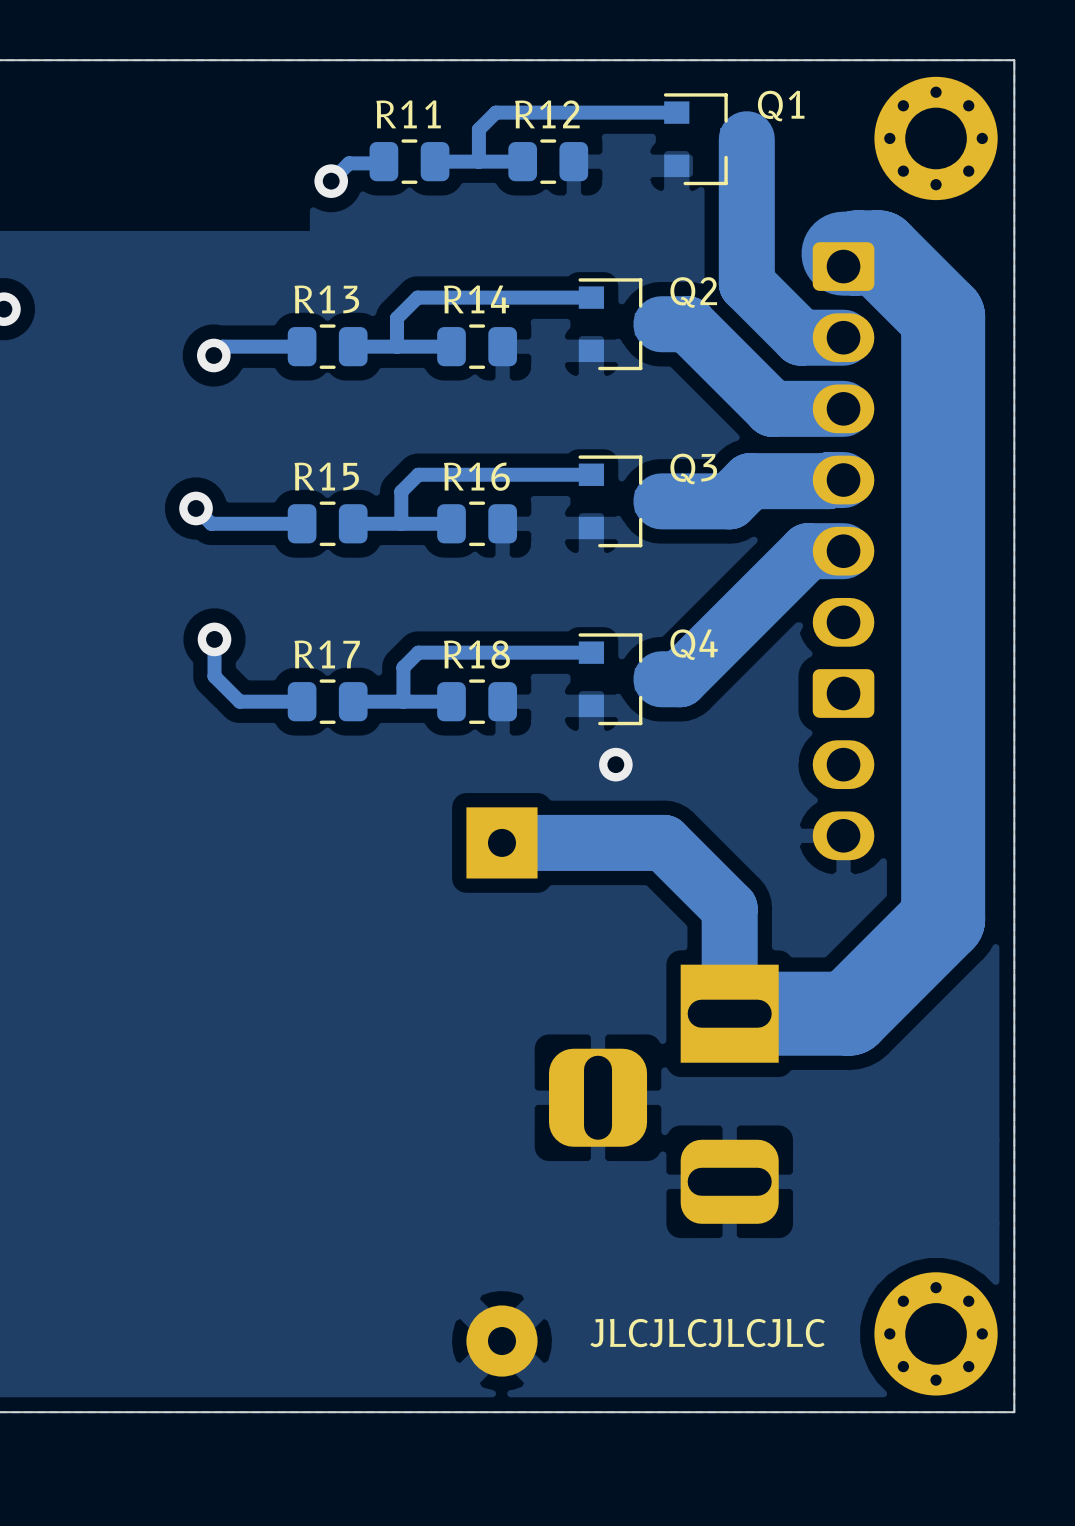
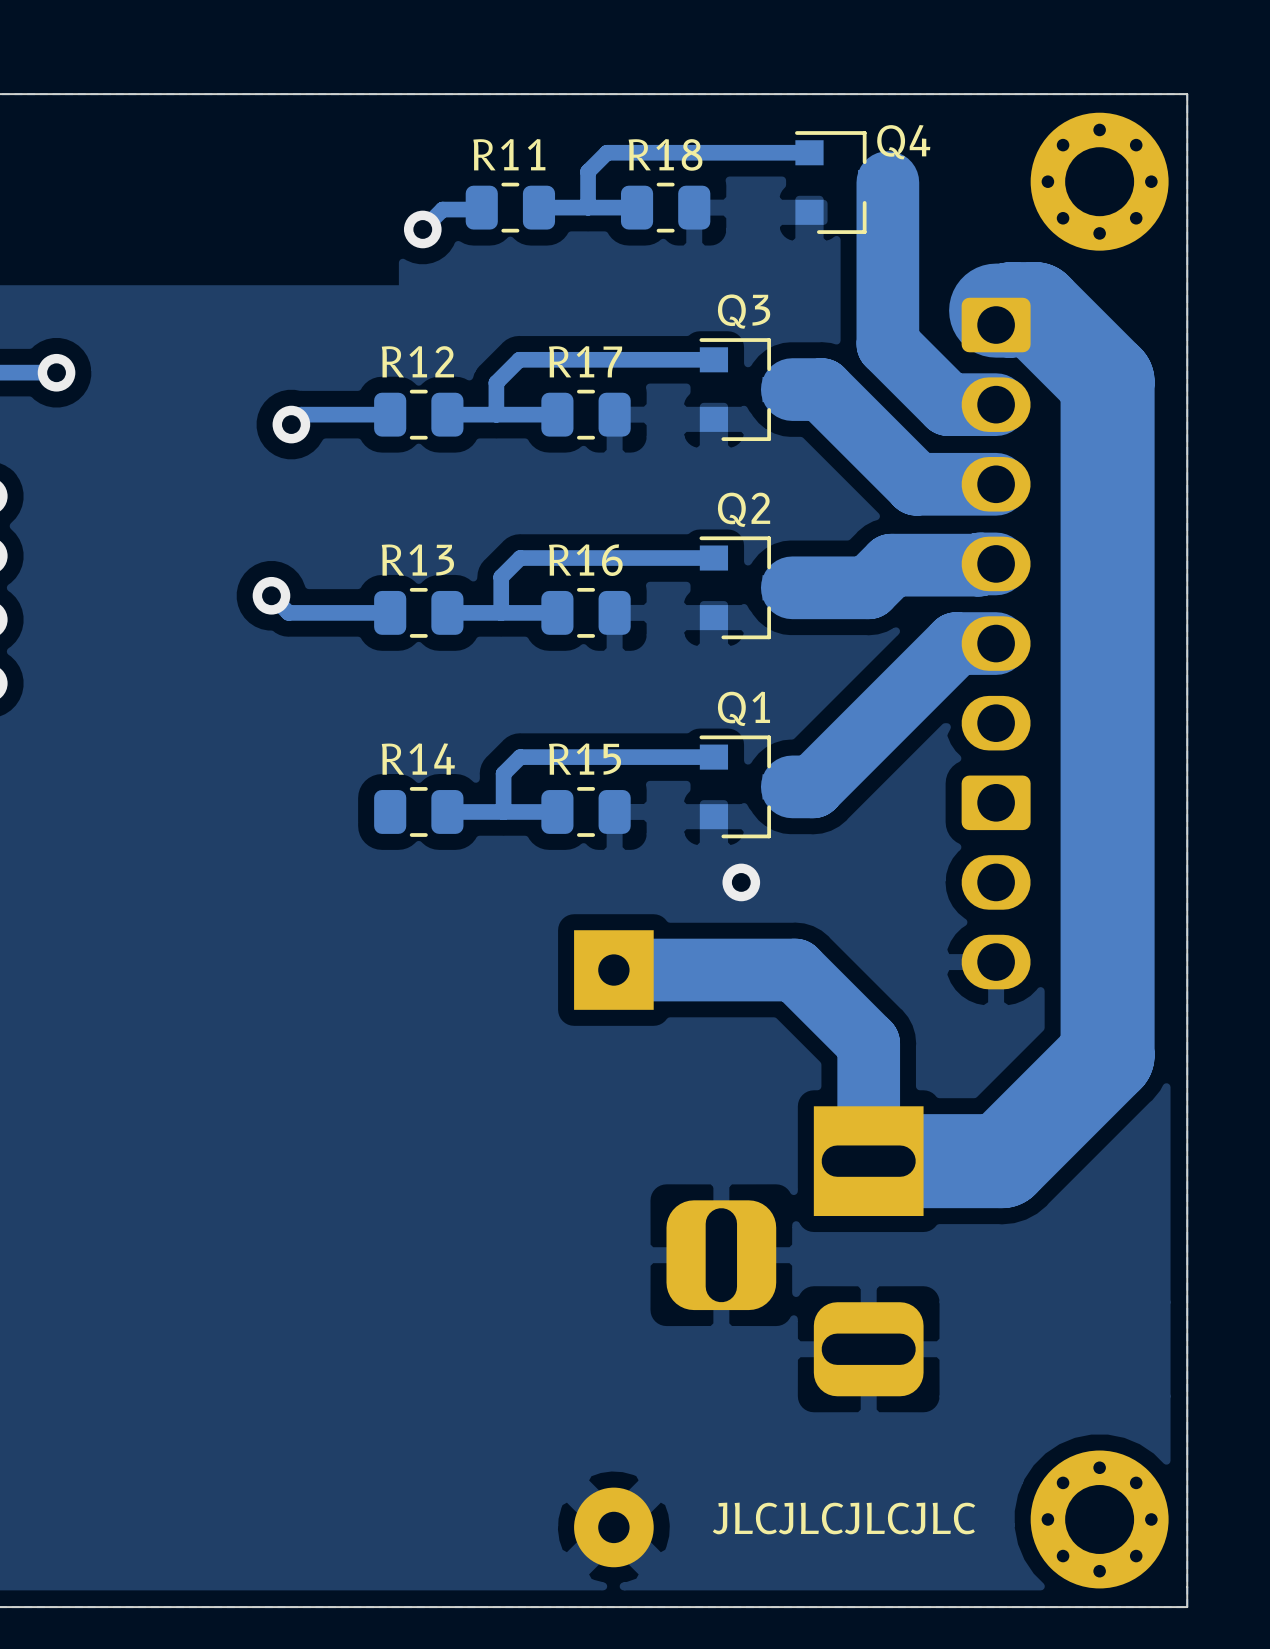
Q1 name: Q1 (781, 106) -> Q4 (903, 142)
R12 name: R12 (547, 114) -> R18 (665, 154)
Q2 name: Q2 (693, 292) -> Q3 (744, 311)
R13 name: R13 (326, 299) -> R12 (417, 361)
R14 name: R14 (476, 299) -> R17 (585, 361)
Q3 name: Q3 (693, 468) -> Q2 (744, 509)
R15 name: R15 (326, 476) -> R13 (417, 559)
track: (214, 639) (214, 676) (239, 701) (302, 701) -> none
via: (214, 639) -> none
Q4 name: Q4 (694, 644) -> Q1 (743, 708)
R17 name: R17 (327, 654) -> R14 (418, 759)
R18 name: R18 (476, 654) -> R15 (585, 759)

